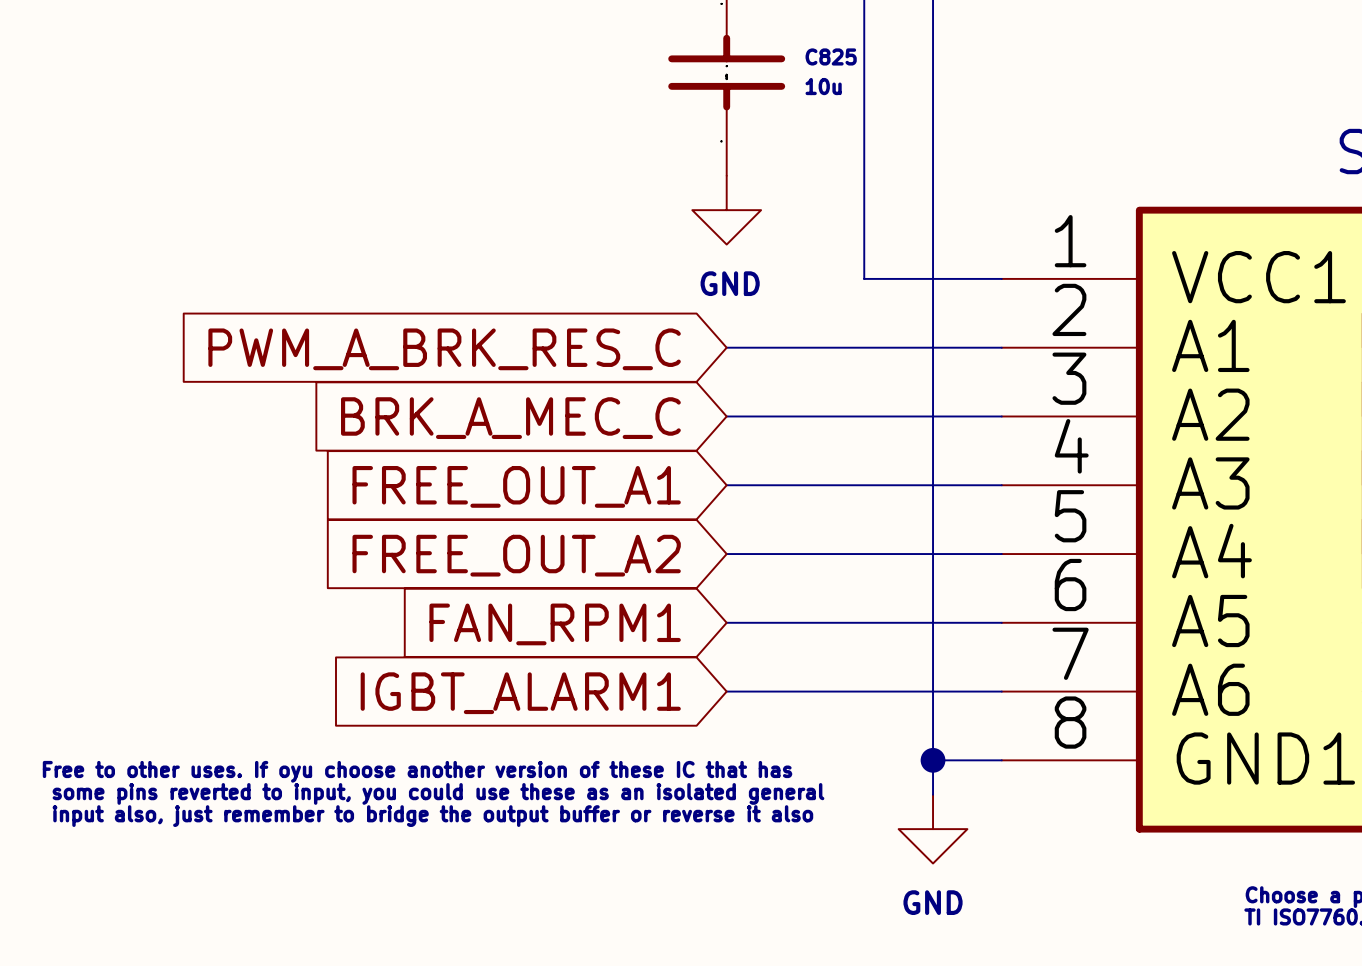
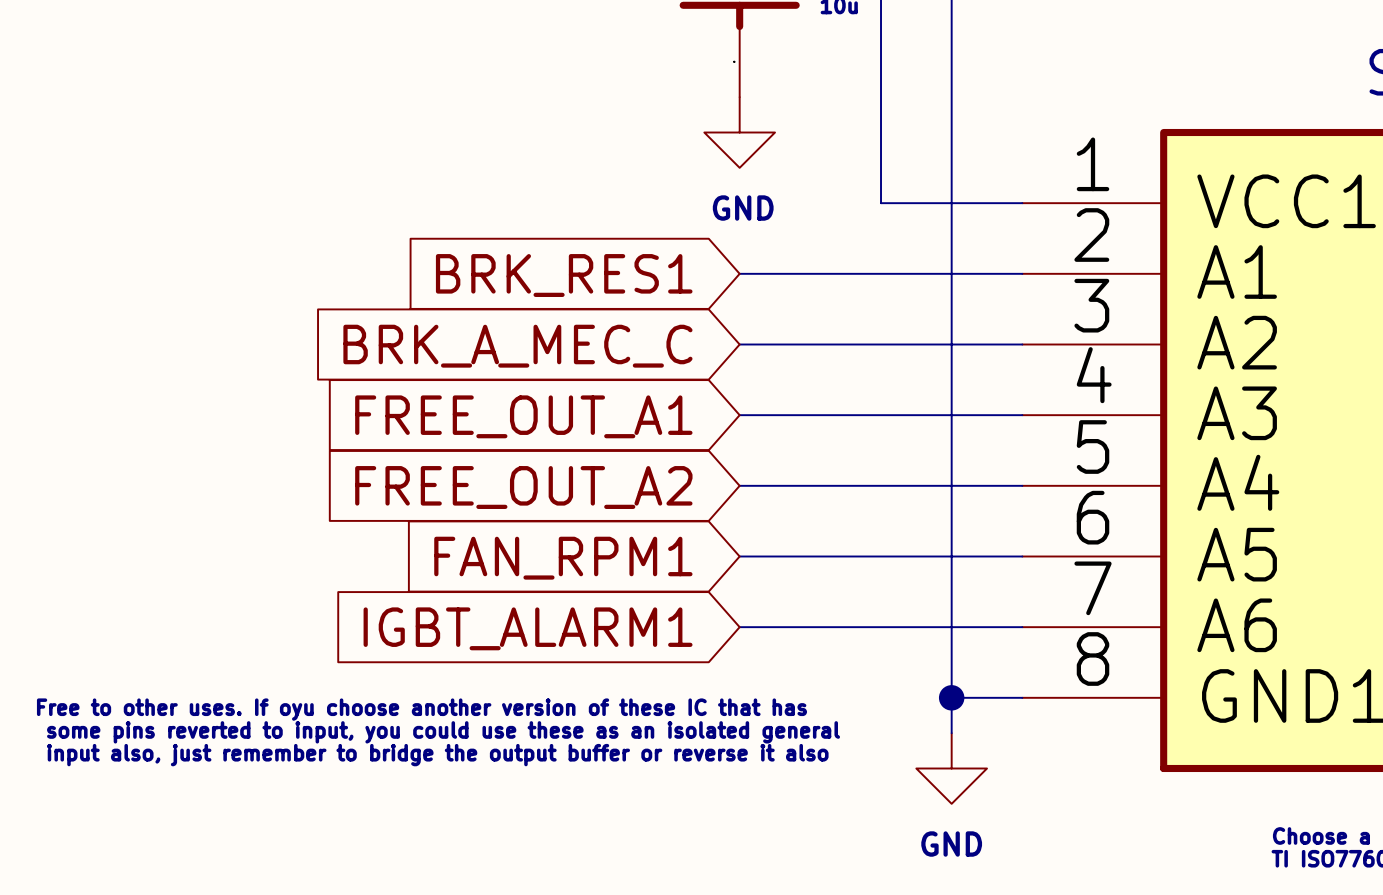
global label: PWM_A_BRK_RES_C (444, 349) -> BRK_RES1 (564, 275)

